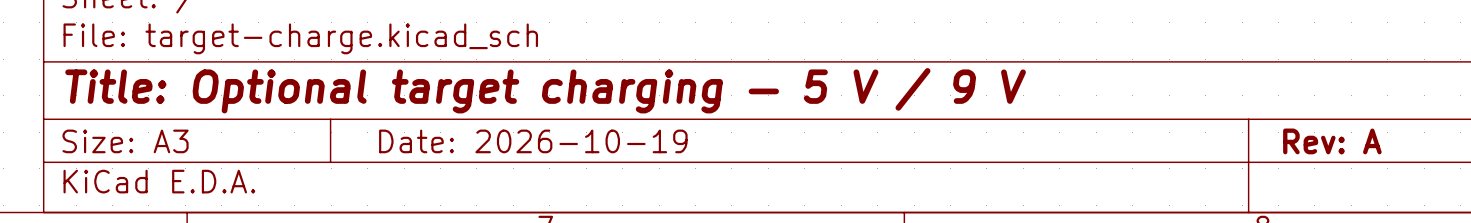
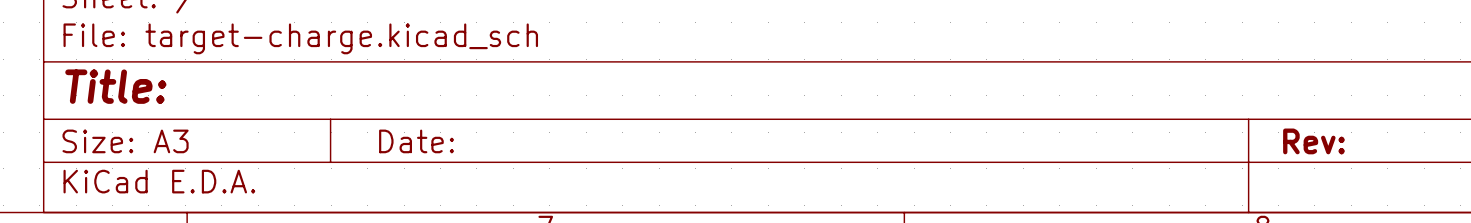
title block: Title: Optional target charging — 5 V / 9 V (545, 90) -> Title: (115, 86)
title block: Date: 2026-10-19 (533, 141) -> Date: (416, 141)
title block: Rev: A (1332, 141) -> Rev: (1313, 141)

